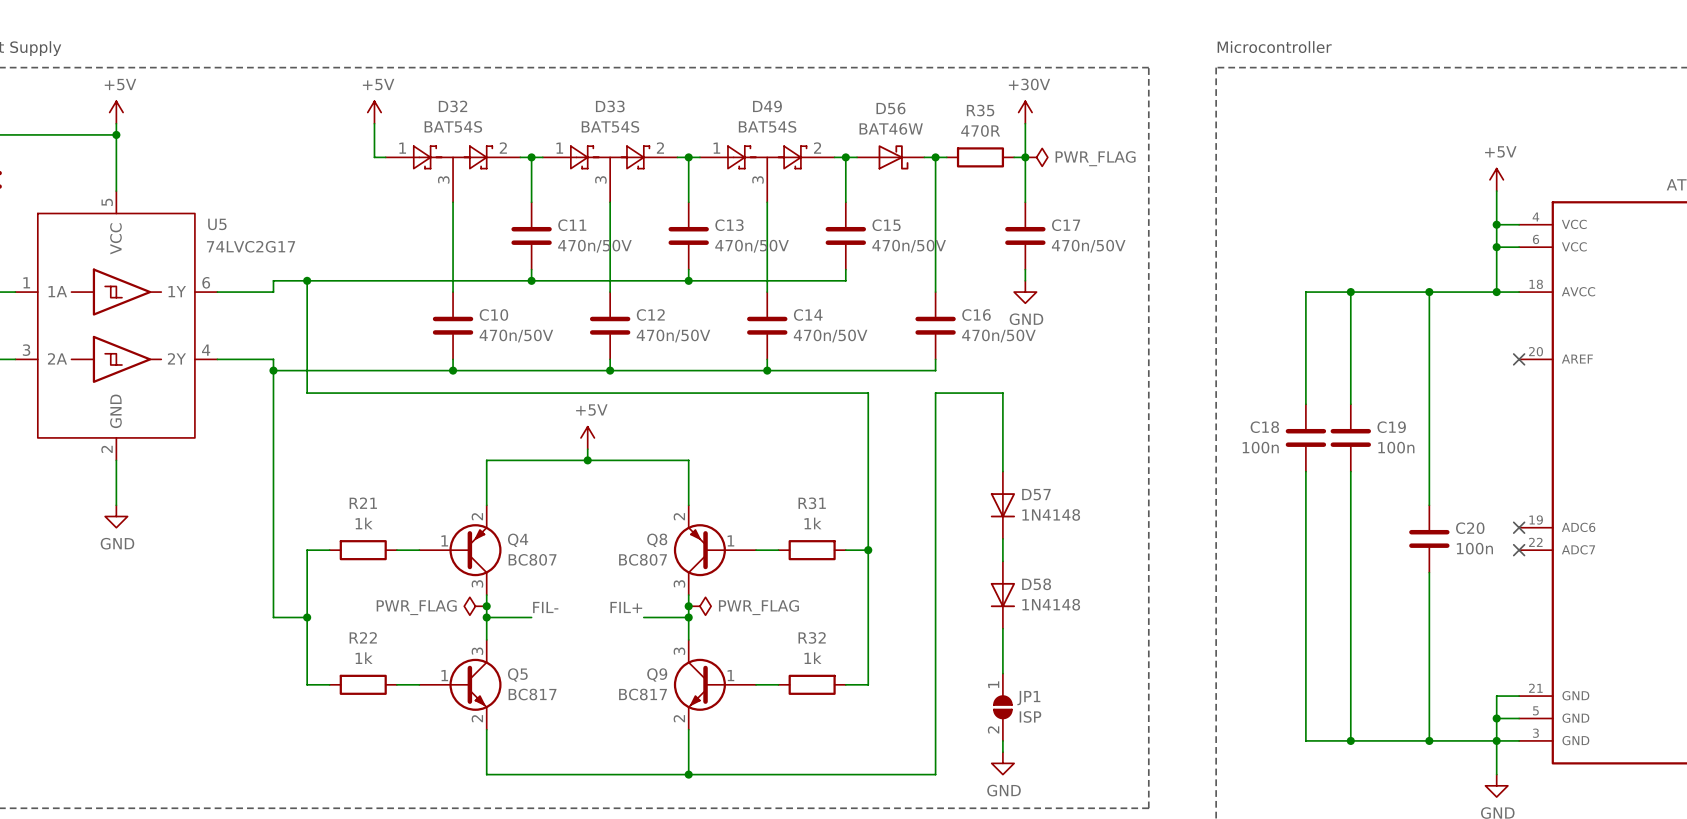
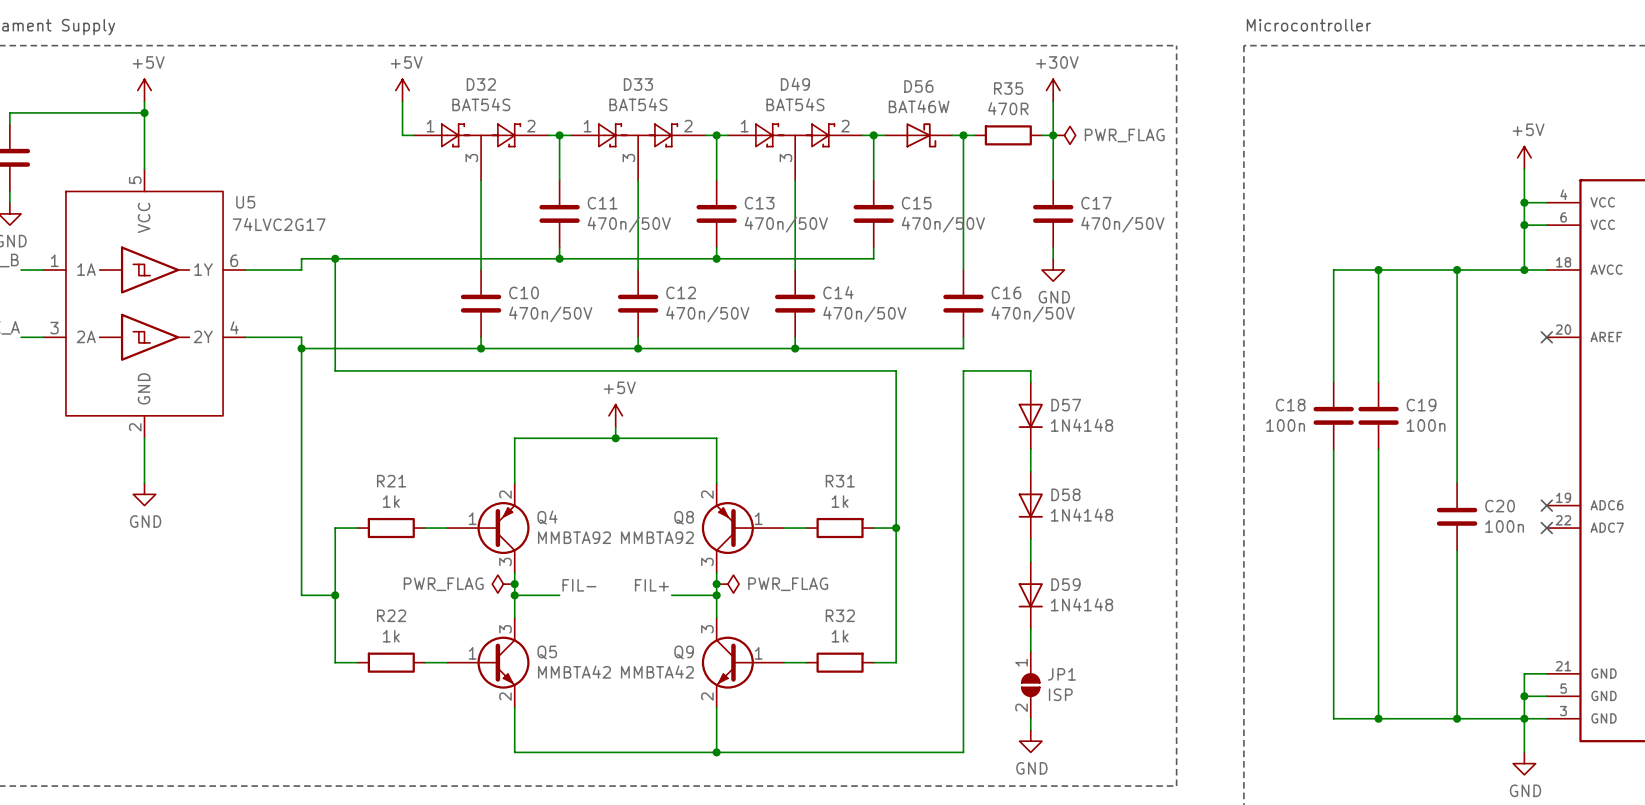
D57 position: (1002, 505) -> (1030, 415)
Q4 value: BC807 (532, 559) -> MMBTA92 (574, 537)
Q8 value: BC807 (643, 559) -> MMBTA92 (657, 537)
D58 position: (1002, 595) -> (1030, 505)
D59: none -> 1N4148 (1030, 595)
Q5 value: BC817 (532, 694) -> MMBTA42 (574, 672)
Q9 value: BC817 (643, 694) -> MMBTA42 (657, 672)

